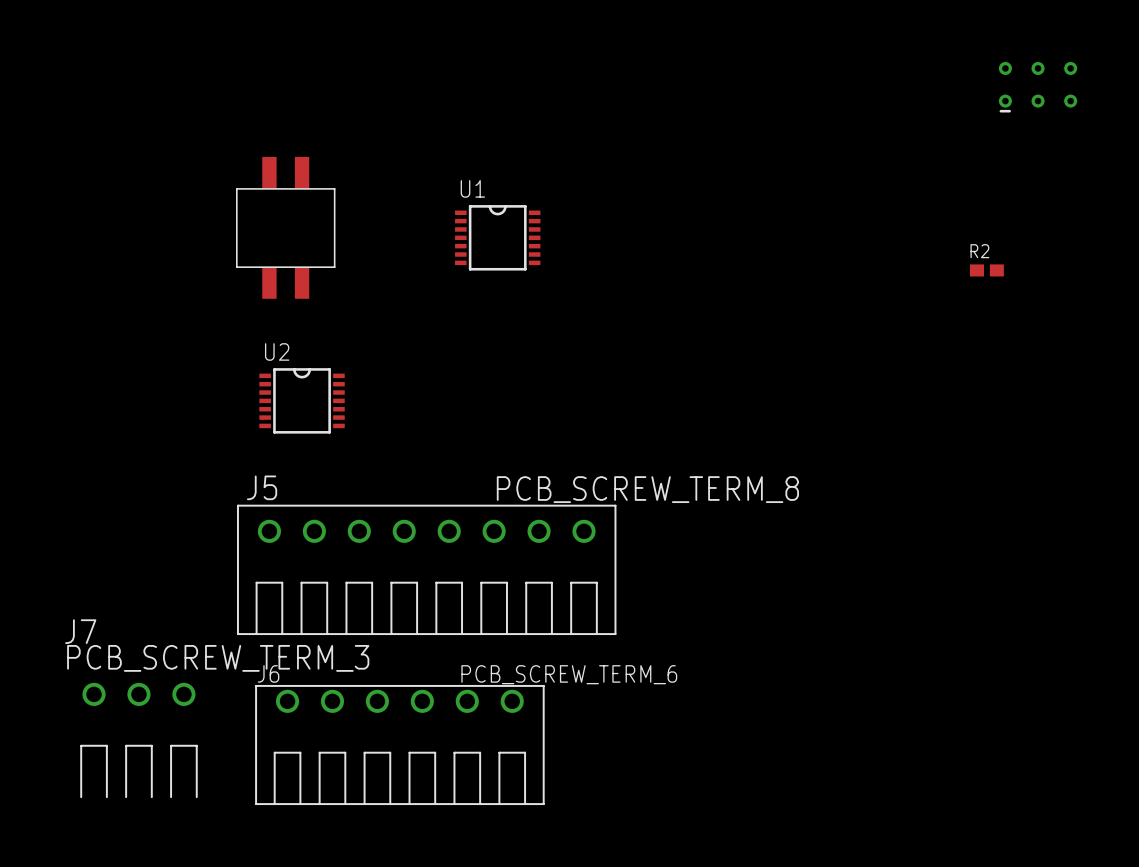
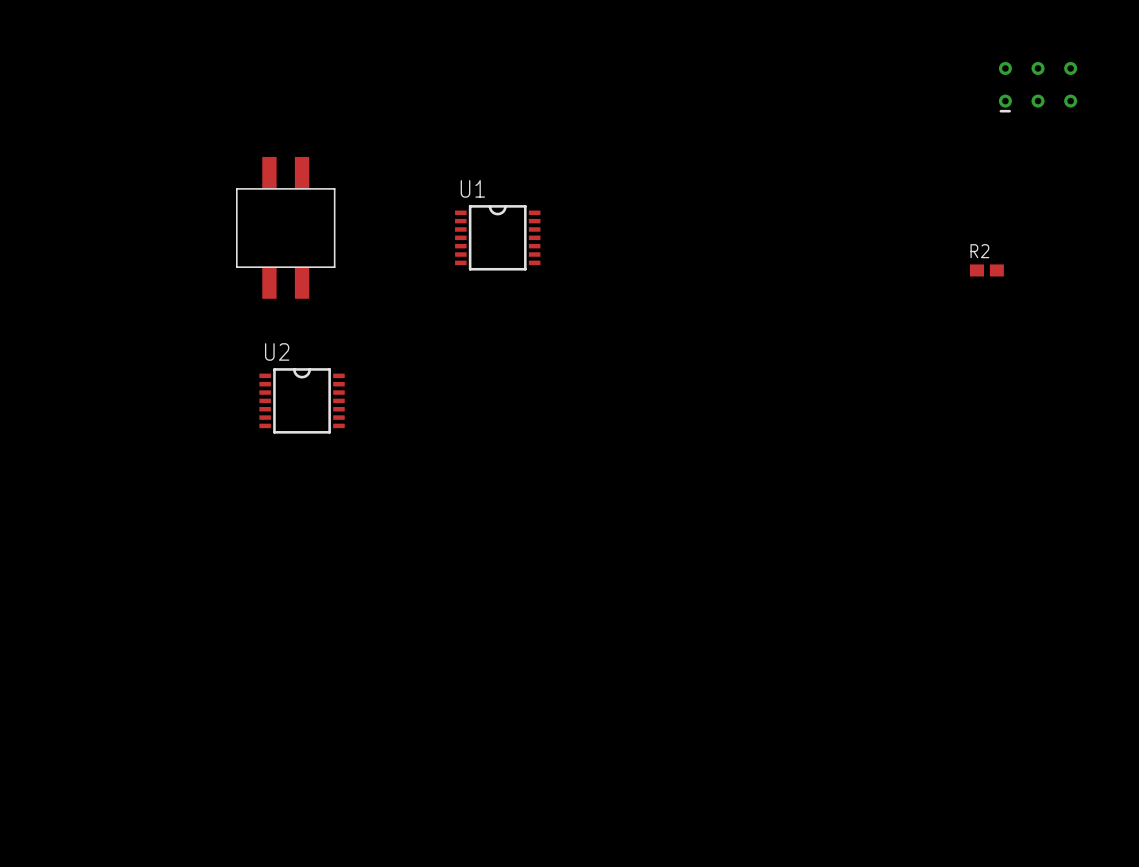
J5: PCB_SCREW_TERM_8 (426, 569) -> none
J7: PCB_SCREW_TERM_3 (138, 740) -> none
J6: PCB_SCREW_TERM_6 (399, 745) -> none

